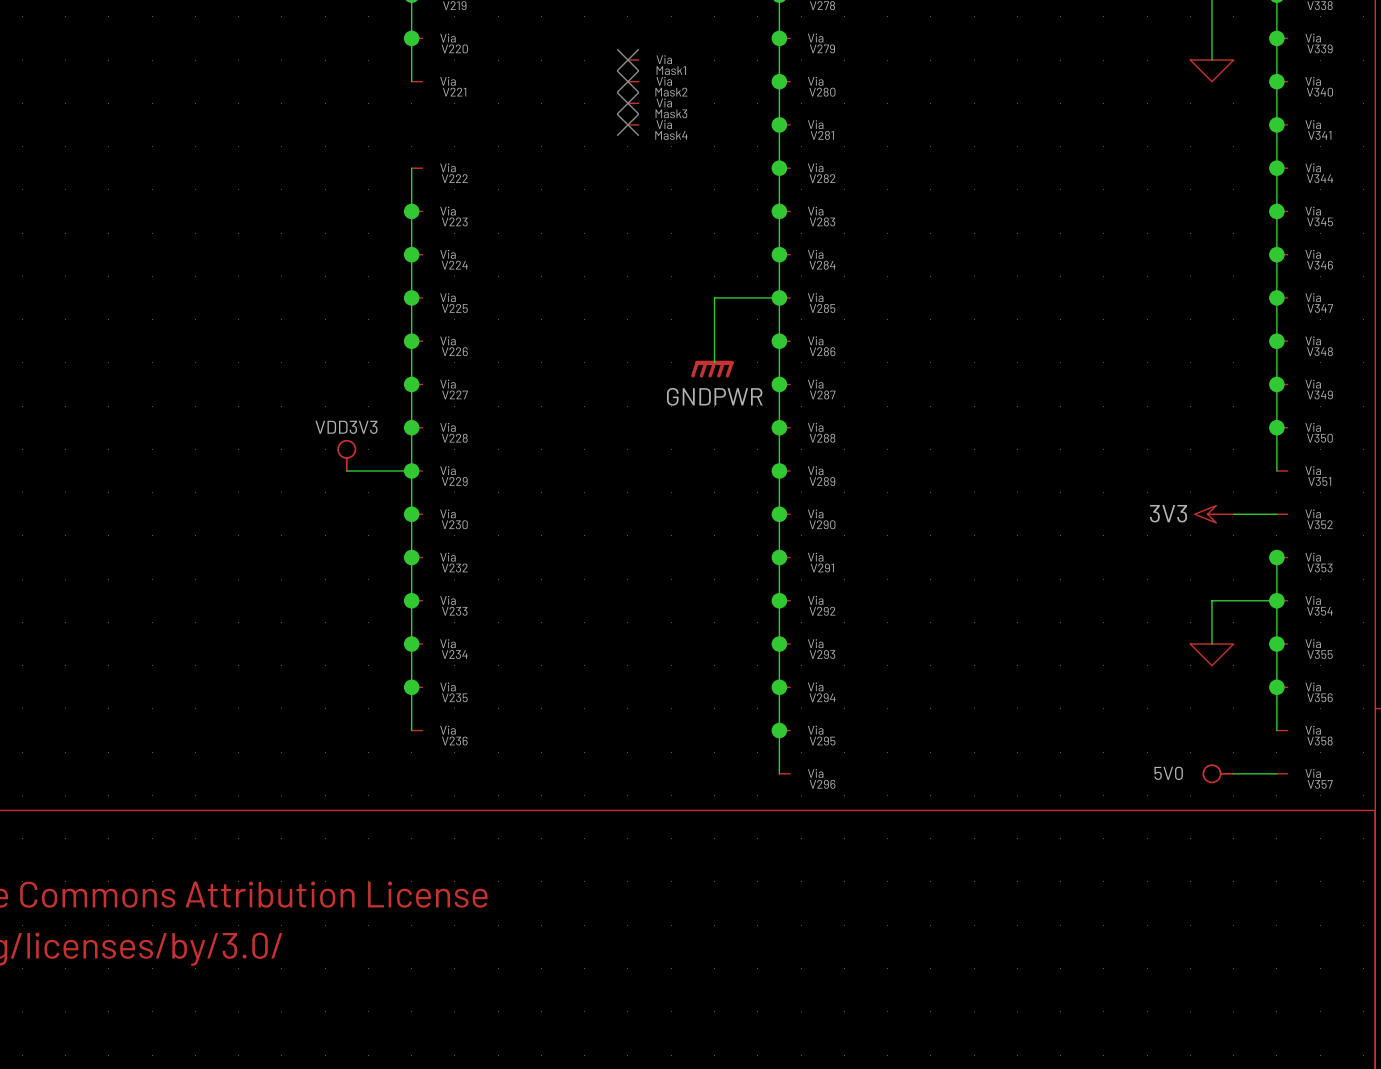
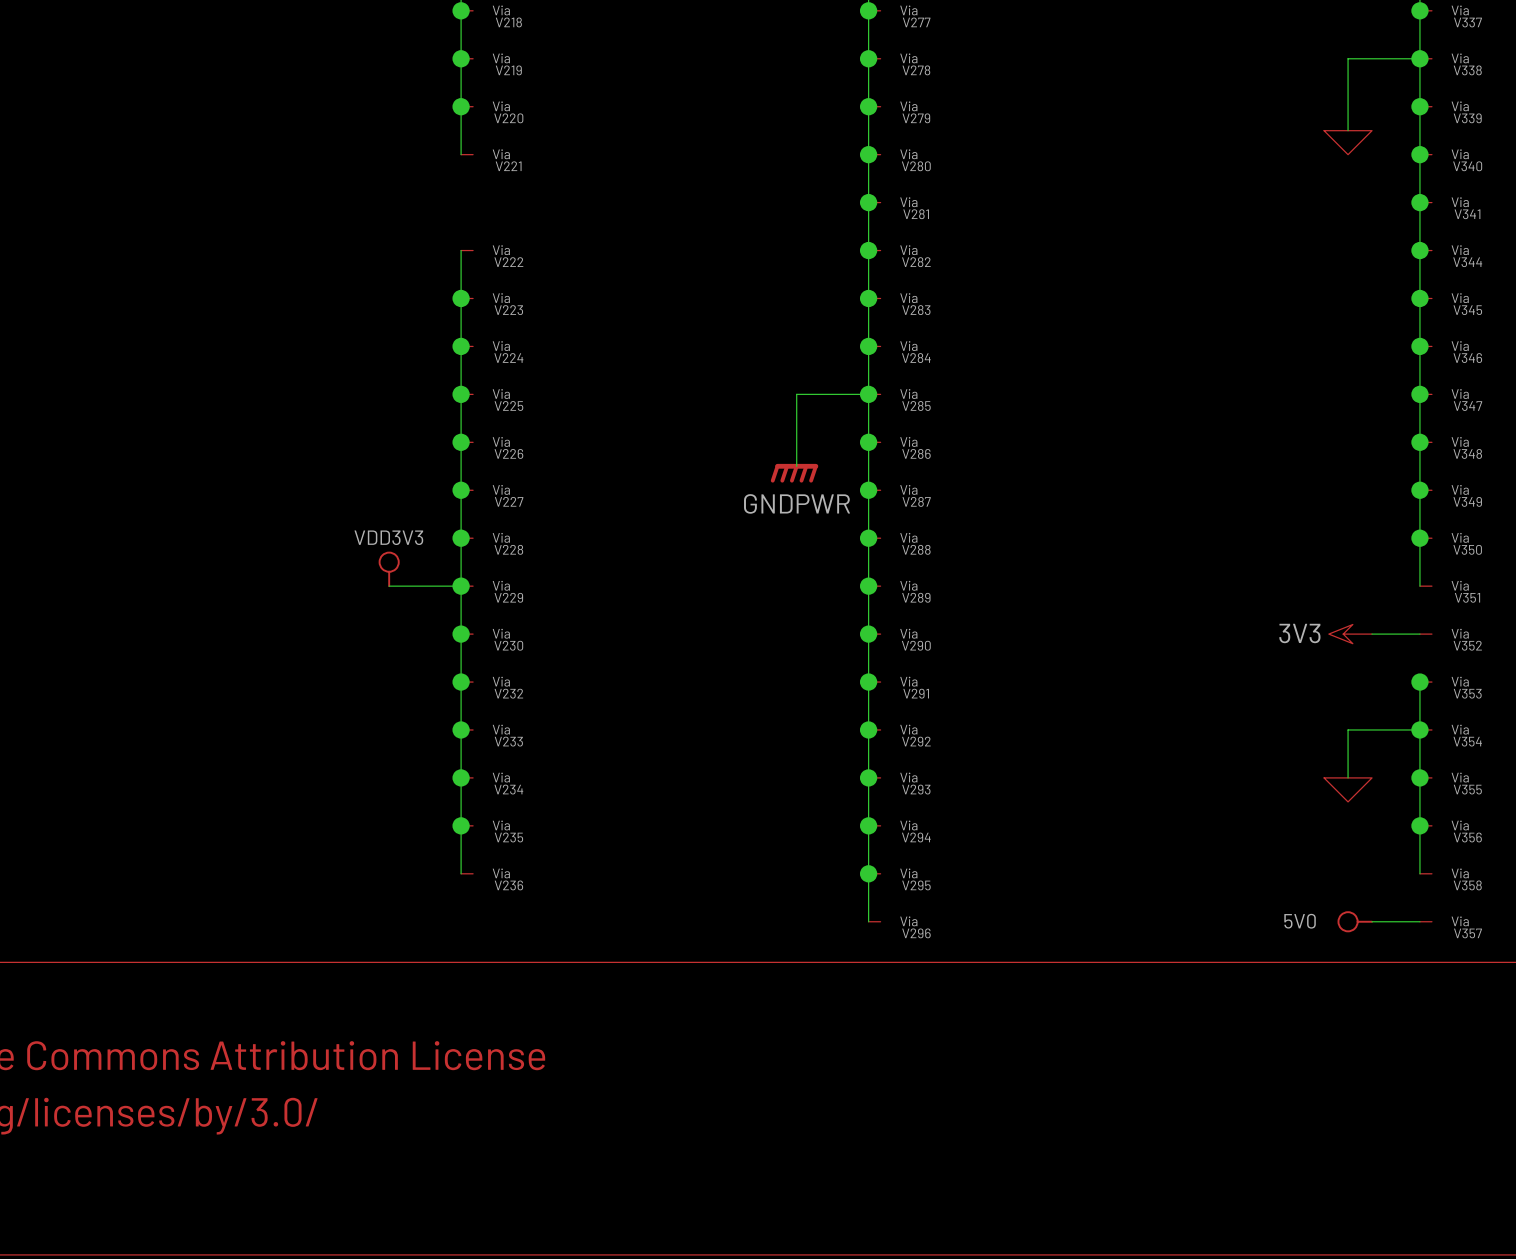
no-connect mark: (627, 60) -> none
Mask1: (633, 60) -> none
no-connect mark: (627, 81) -> none
Mask2: (633, 81) -> none
no-connect mark: (627, 103) -> none
Mask3: (633, 103) -> none
no-connect mark: (627, 124) -> none
Mask4: (633, 124) -> none

